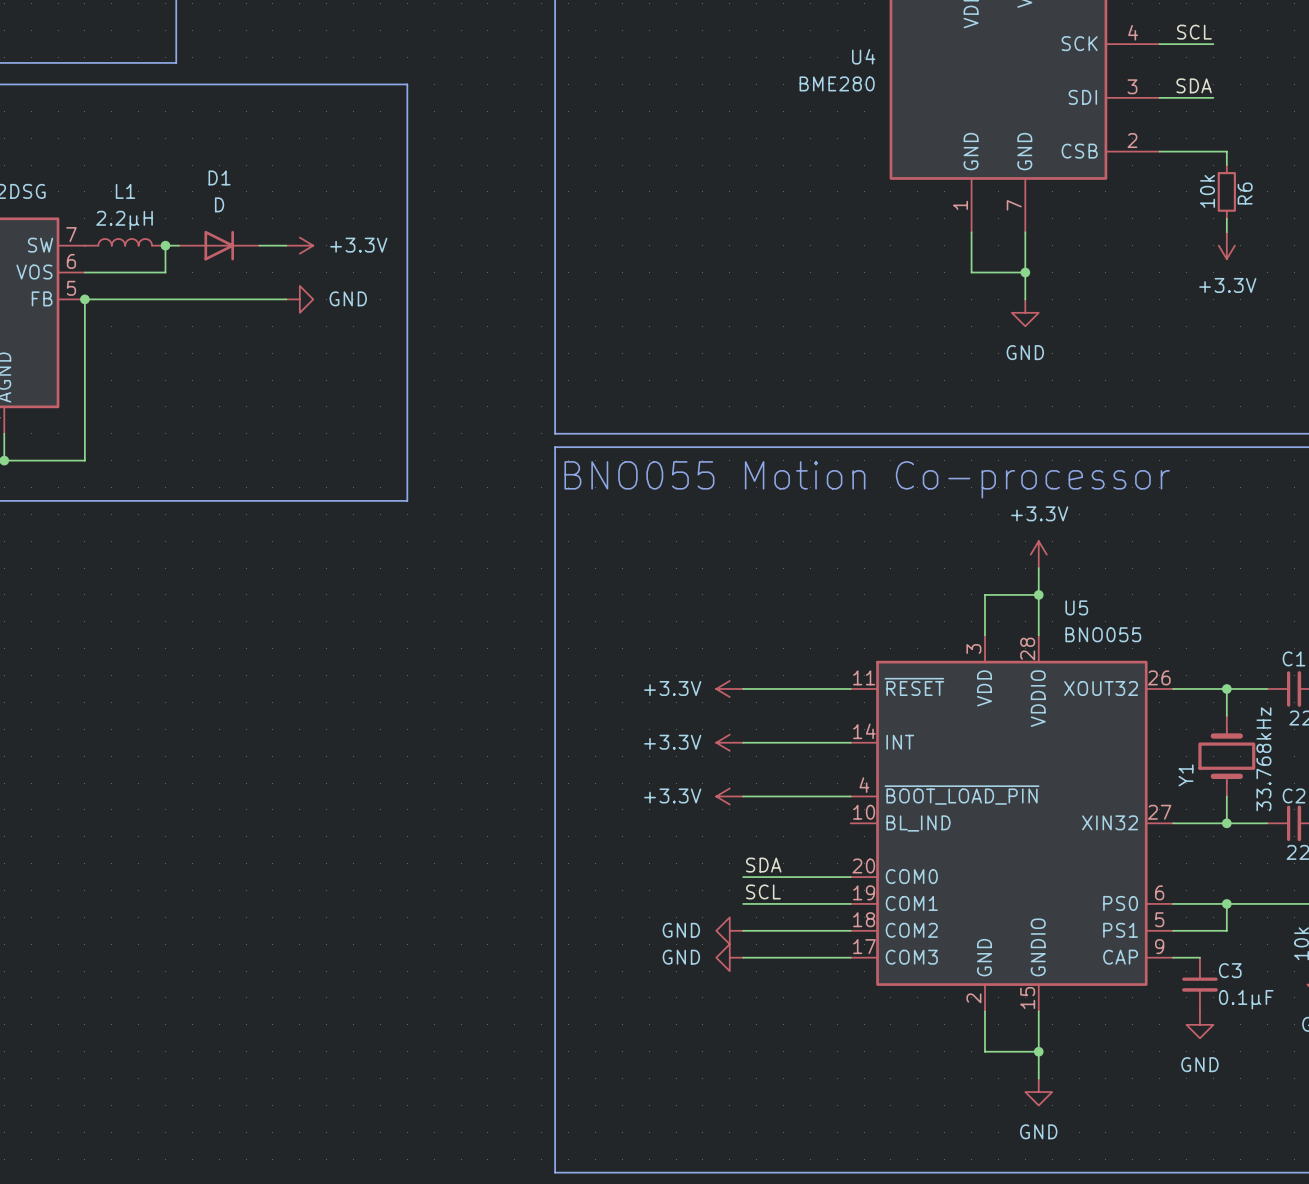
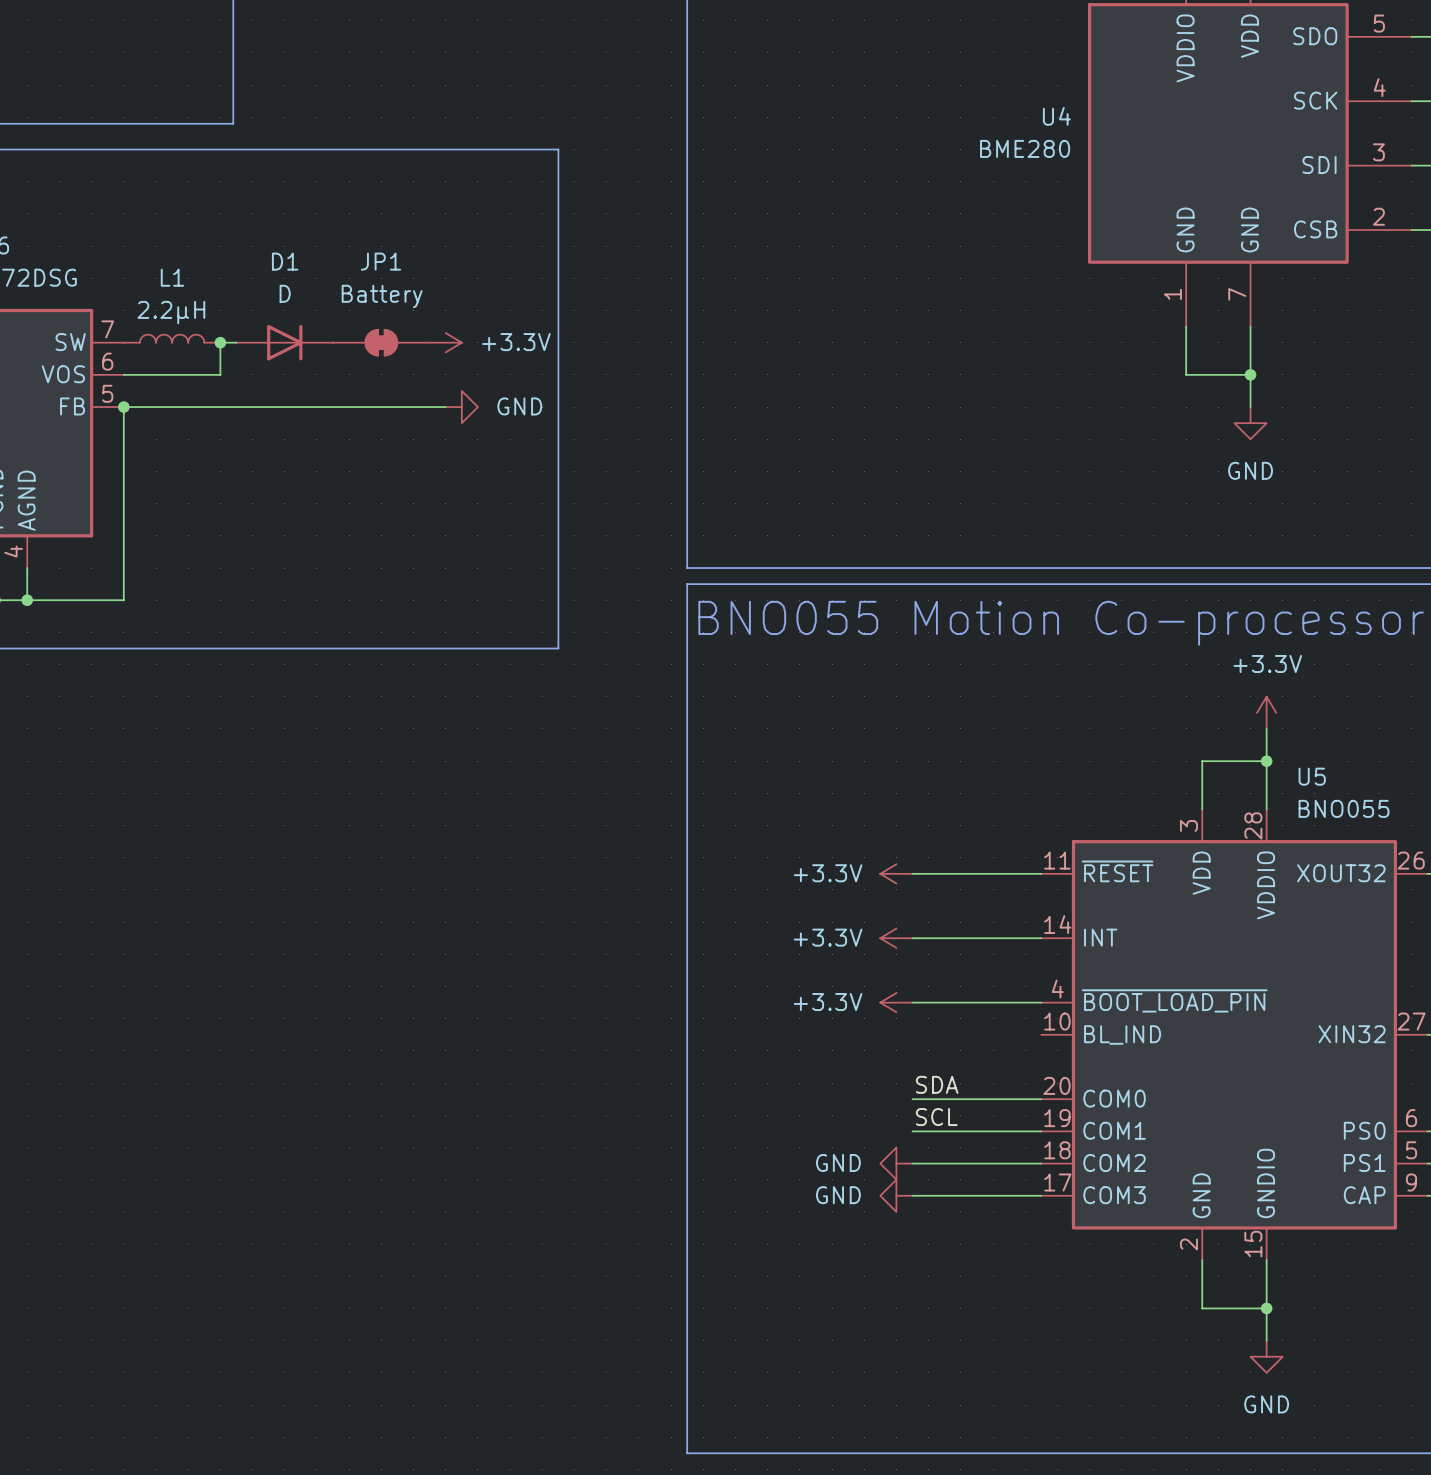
line: (407, 84) (407, 500) -> (510, 149) (558, 149) (558, 648) (510, 648)
power symbol position: +3.3V (299, 245) -> +3.3V (445, 342)
JP1: none -> Battery (381, 342)
wire: none -> (365, 407) (445, 407)
power symbol position: GND (299, 299) -> GND (461, 407)

